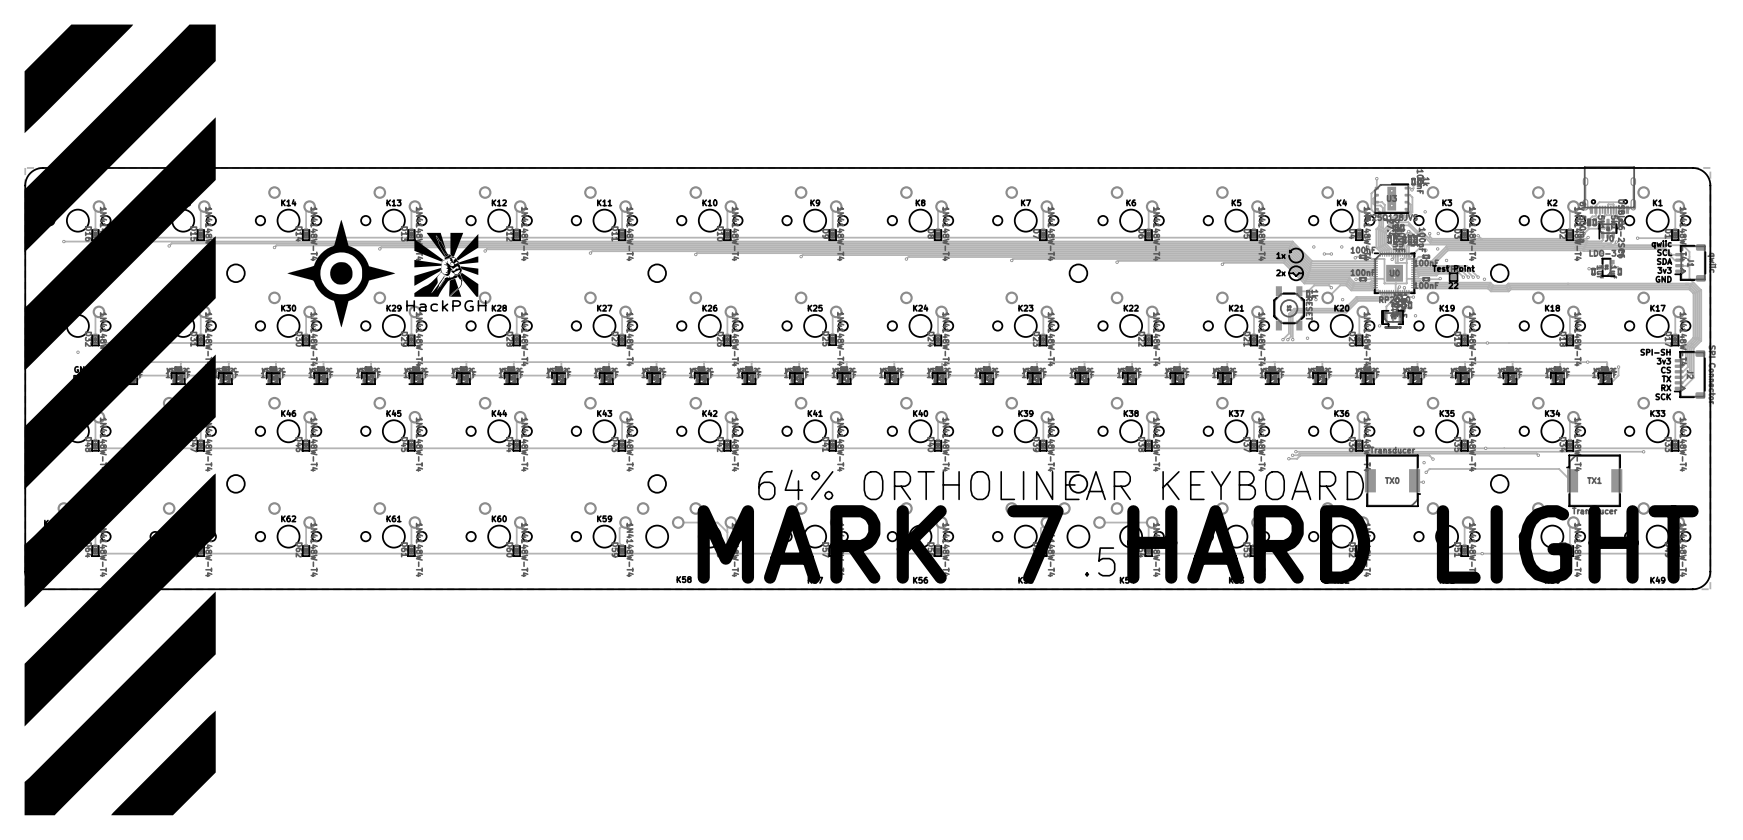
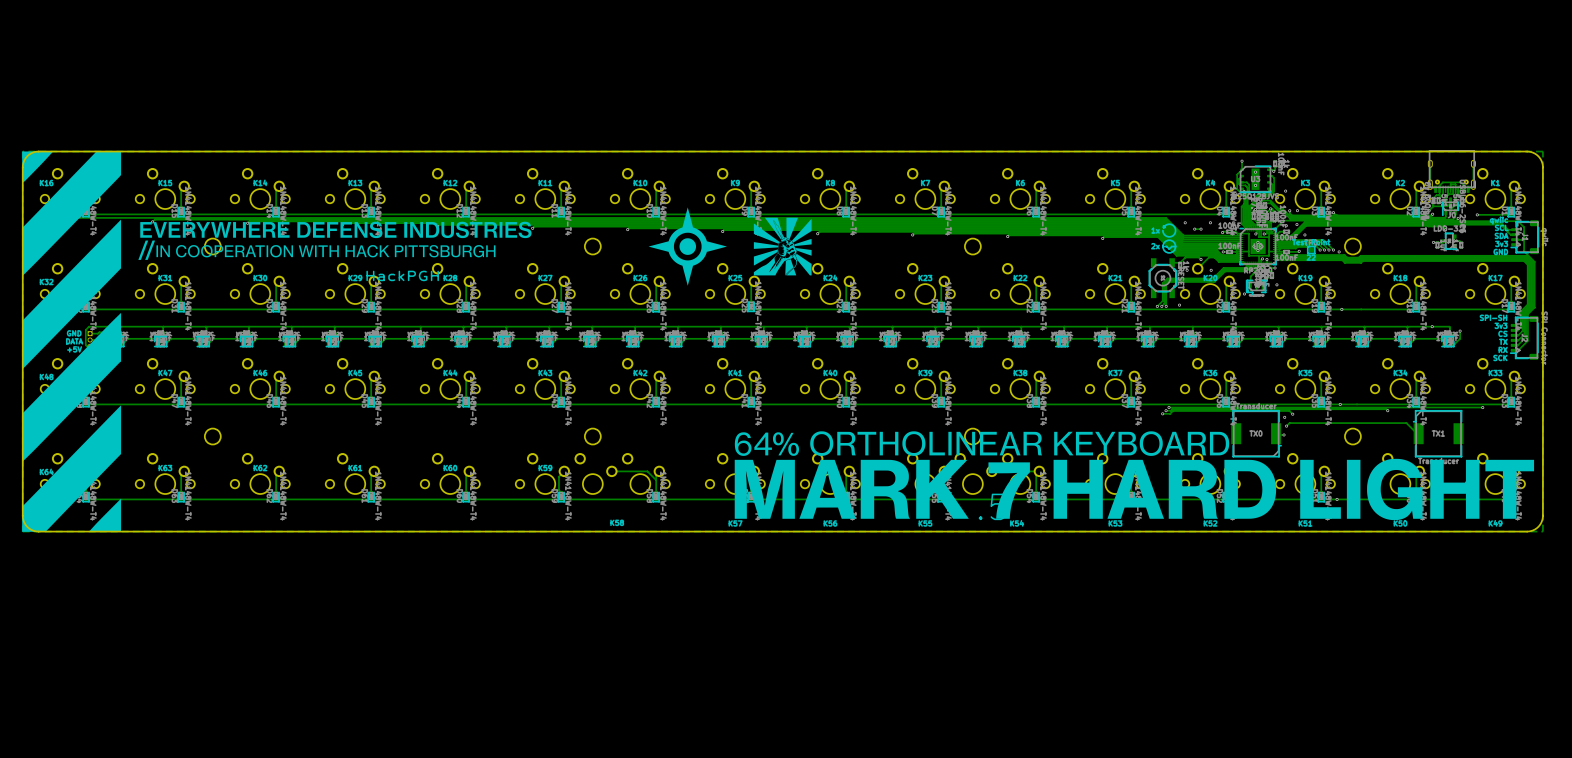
drawing: [24, 24, 216, 816] -> none
drawing: none -> [22, 151, 1544, 532]
drawing: [287, 219, 396, 328] -> none
drawing: [414, 232, 479, 297] -> none
text: 64% ORTHOLINEAR KEYBOARD (1061, 484) -> none
text: MARK 7 HARD LIGHT (1198, 544) -> none

